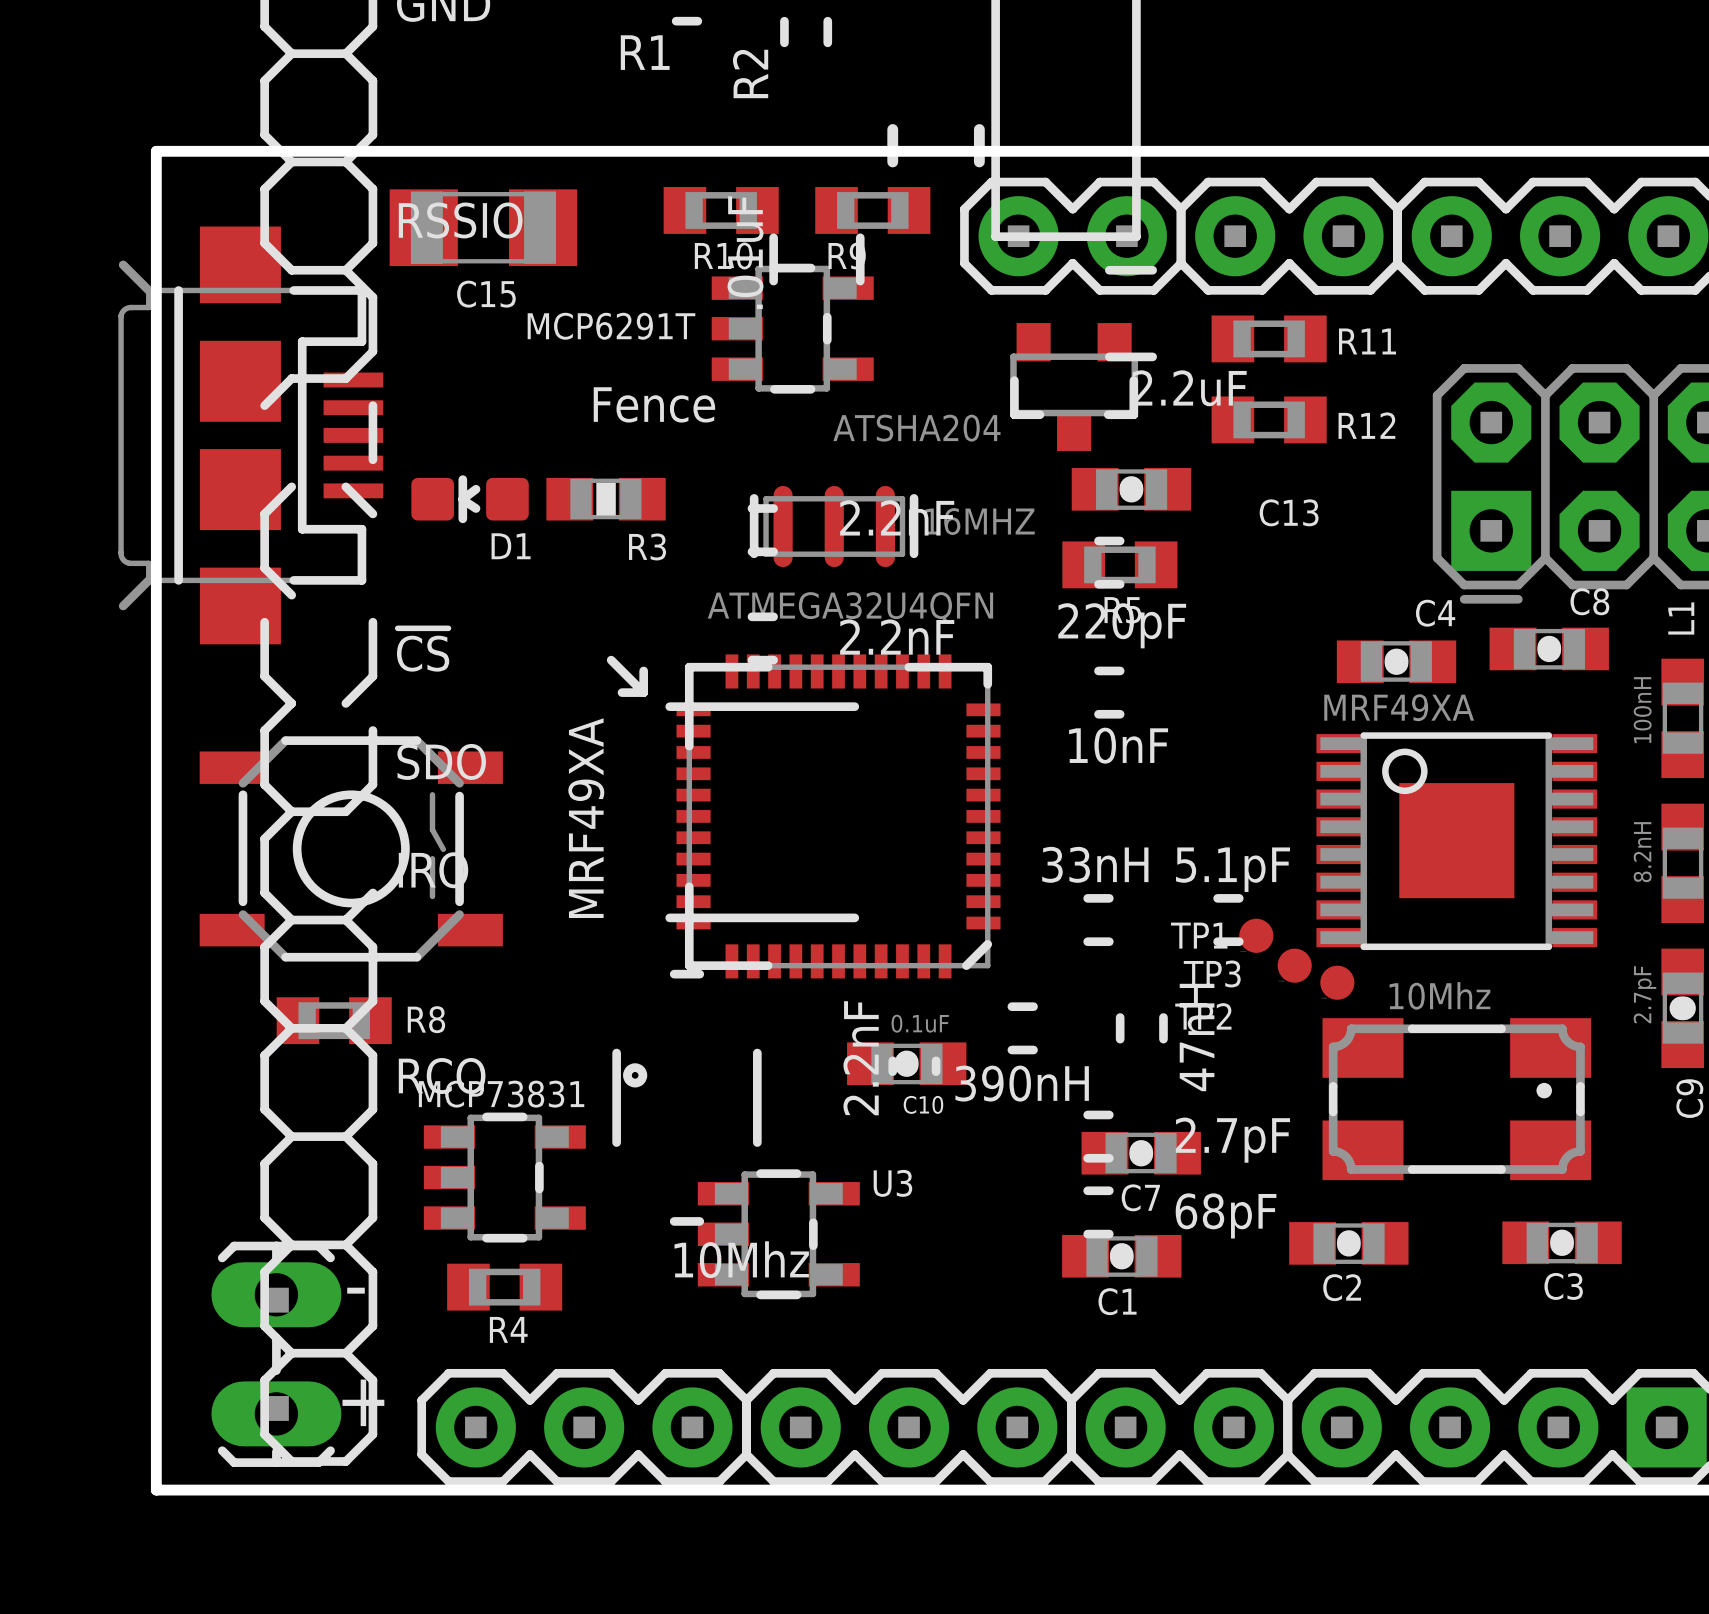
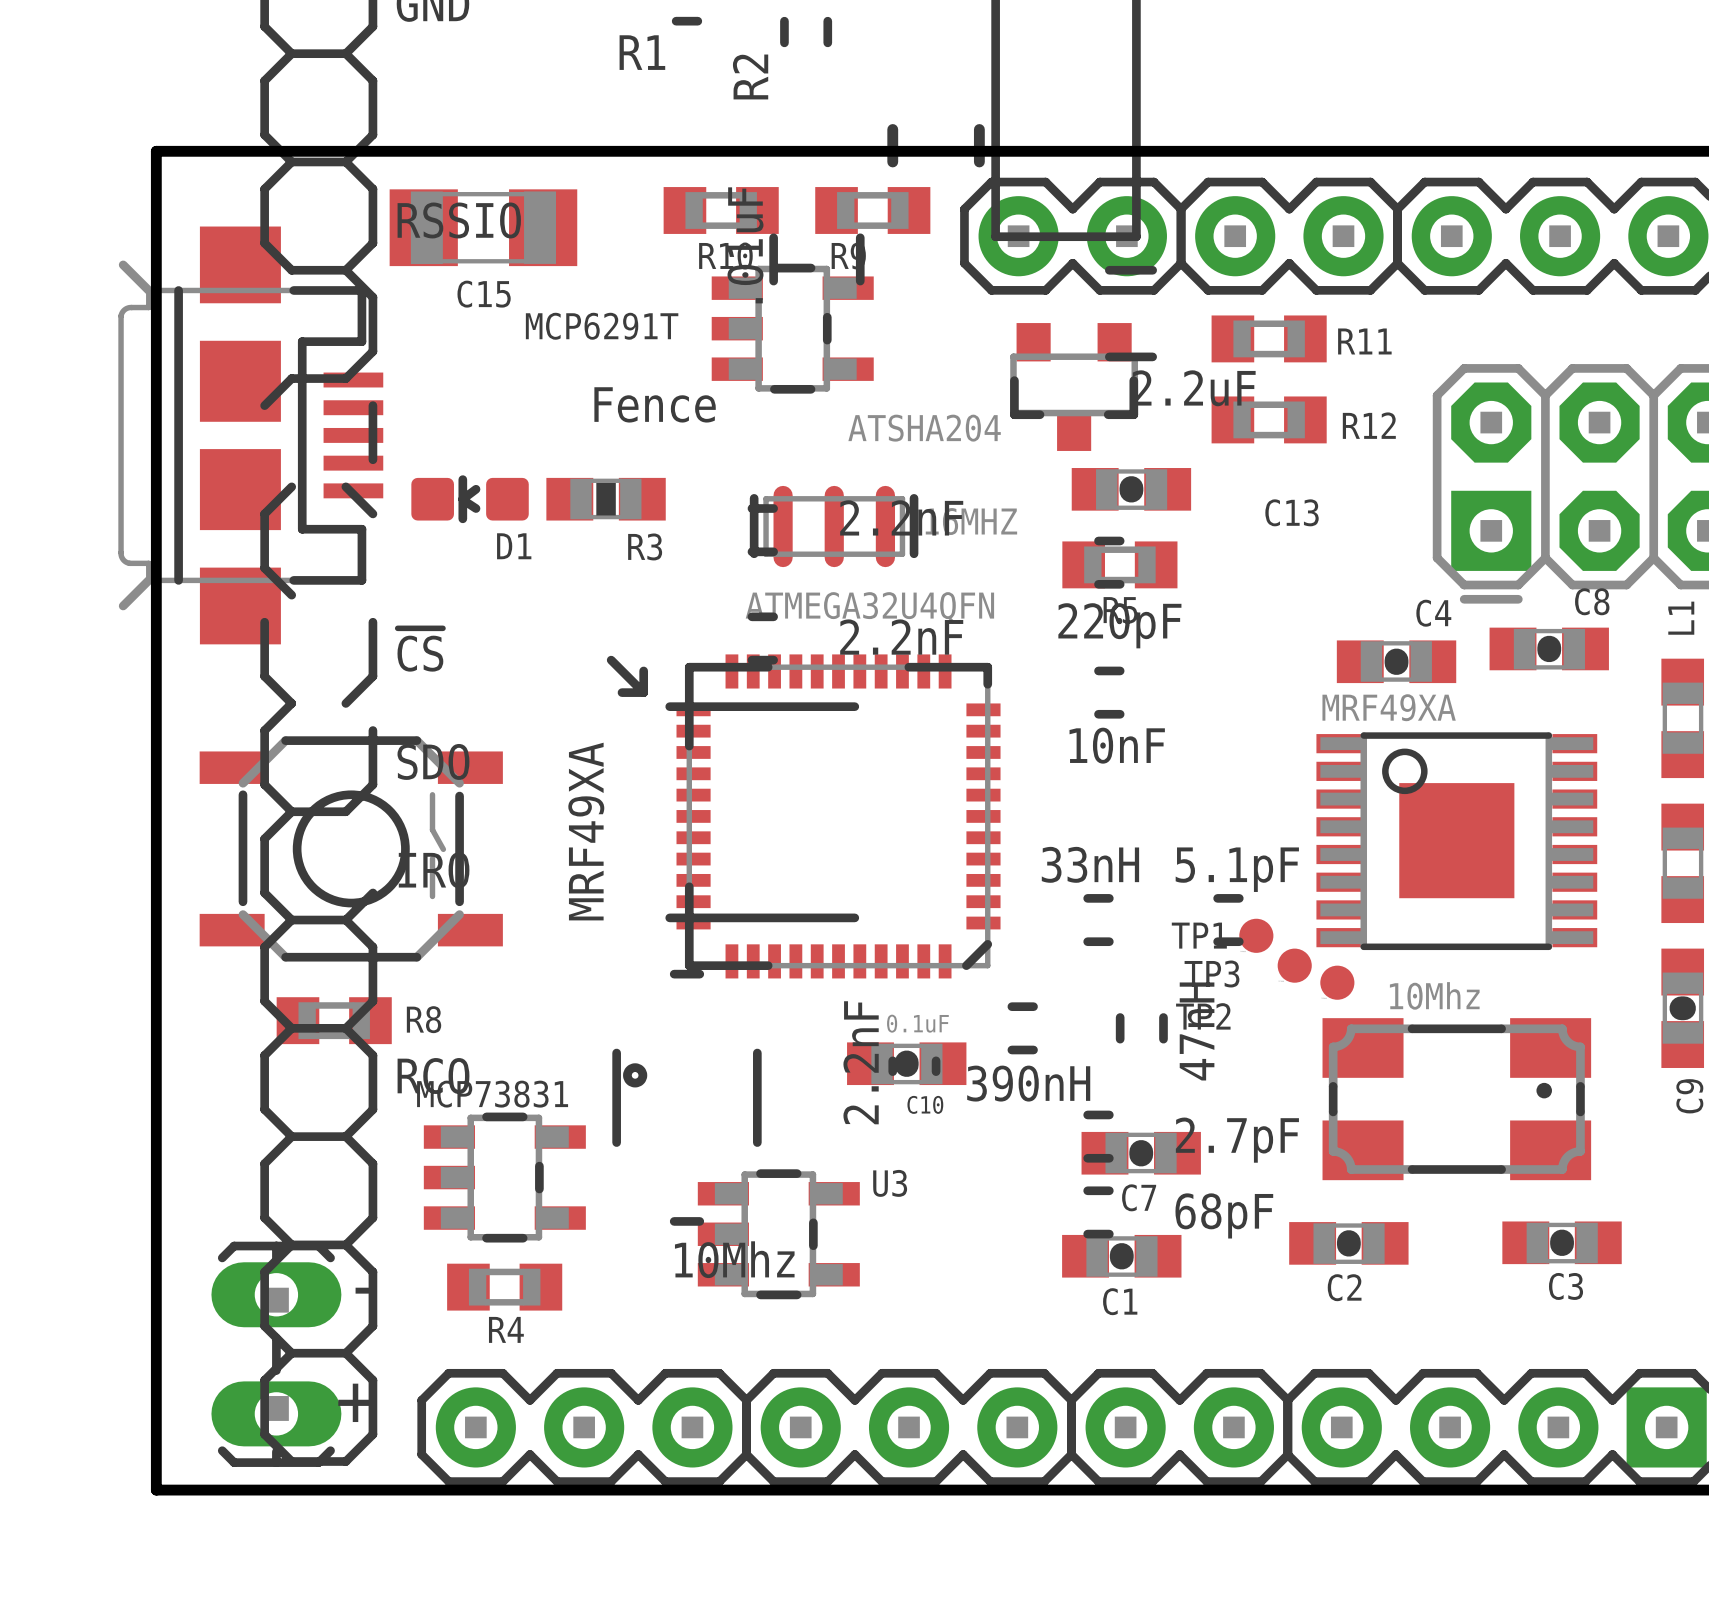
L1 value: 100nH (1642, 710) -> none
part value: 8.2nH (1642, 852) -> none
C9 value: 2.7pF (1644, 994) -> none

